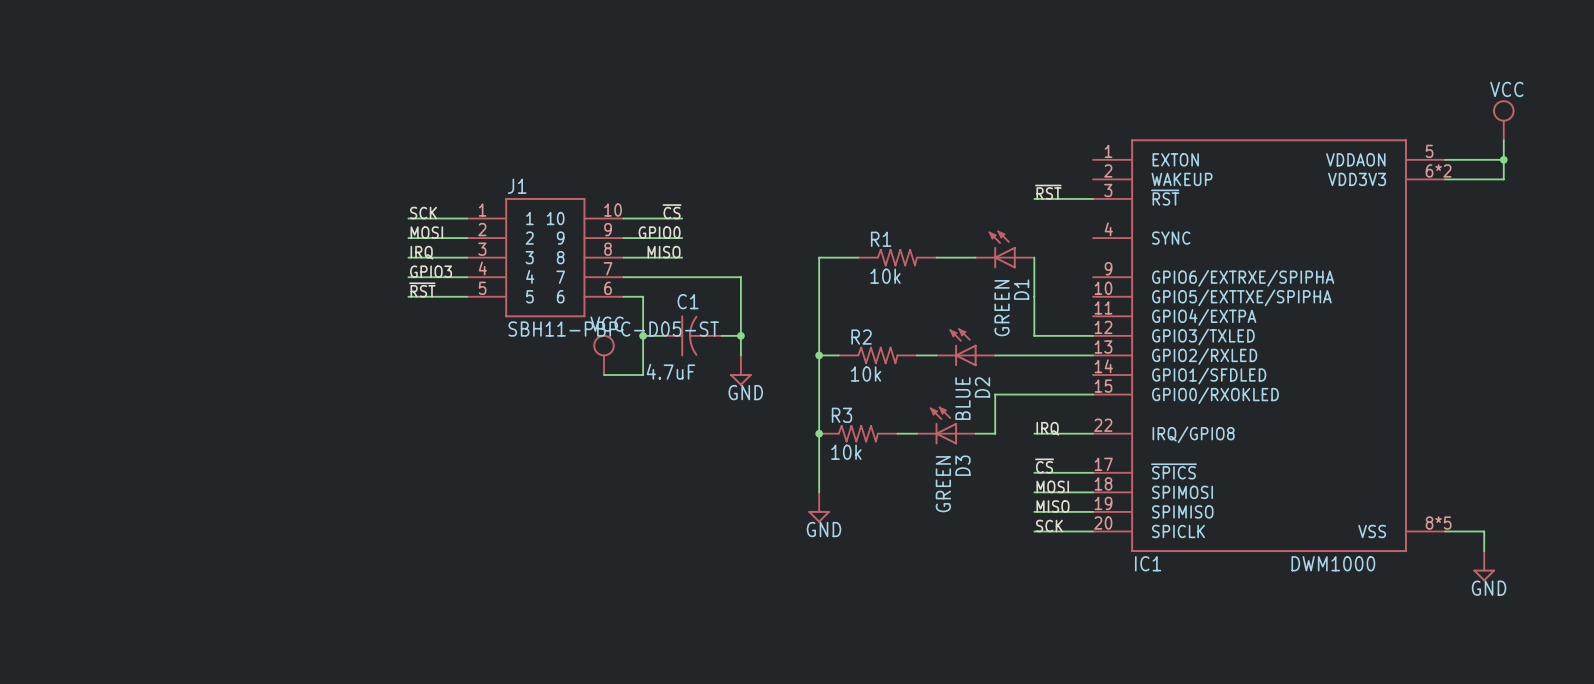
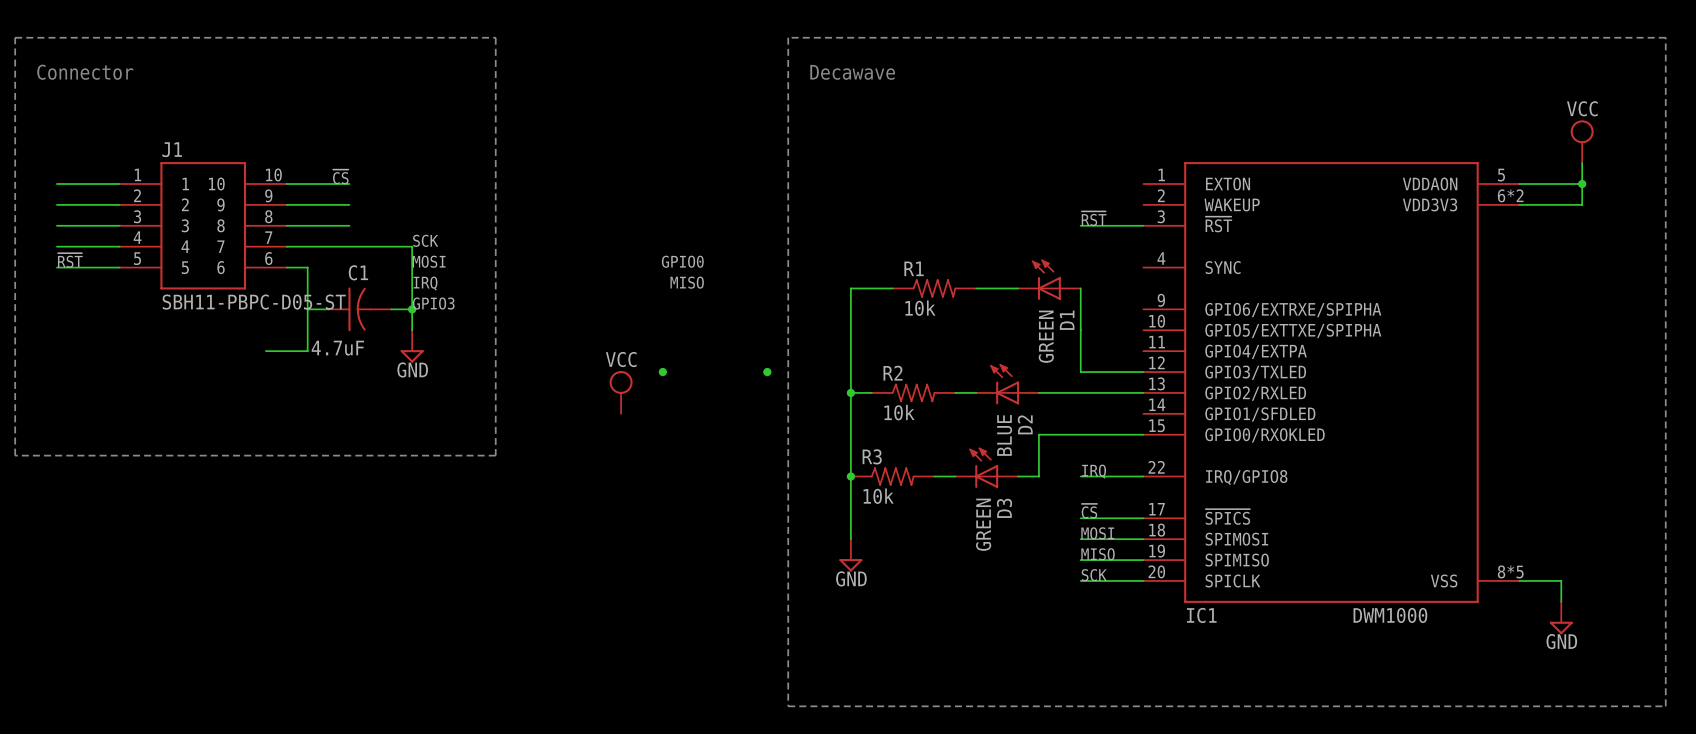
line: none -> (15, 37) (495, 37) (495, 455) (15, 455) (15, 37)
line: none -> (788, 37) (1665, 37) (1665, 706) (788, 706) (788, 37)
text: none -> Connector (85, 72)
text: none -> Decawave (852, 72)
label: none -> ~{CS} (340, 176)
wire: none -> (56, 184) (119, 184)
wire: none -> (56, 204) (119, 204)
wire: none -> (56, 225) (119, 225)
label: ~{CS} (672, 211) -> none
wire: none -> (56, 246) (119, 246)
wire: (408, 218) (467, 218) -> (286, 184) (349, 184)
wire: (623, 218) (682, 218) -> none
label: none -> ~{RST} (70, 260)
wire: none -> (56, 267) (119, 267)
wire: none -> (286, 267) (307, 267) (307, 351) (265, 351)
wire: (408, 238) (467, 238) -> (286, 204) (349, 204)
wire: (623, 238) (682, 238) -> none
wire: (408, 257) (467, 257) -> (286, 225) (349, 225)
J1 position: (545, 257) -> (203, 225)
wire: (623, 257) (682, 257) -> none
wire: none -> (307, 309) (328, 309)
wire: (408, 277) (467, 277) -> (412, 309) (391, 309)
junction: none -> (412, 309)
wire: (623, 277) (740, 277) (740, 355) -> none
label: ~{RST} (422, 290) -> none
wire: (408, 296) (467, 296) -> (412, 330) (412, 246) (286, 246)
wire: (623, 296) (643, 296) (643, 375) (604, 375) -> none
power symbol: none -> GND (412, 346)
wire: (643, 335) (662, 335) -> none
C1 position: (692, 335) -> (359, 309)
wire: (721, 335) (740, 335) -> none
power symbol: GND (740, 370) -> none

